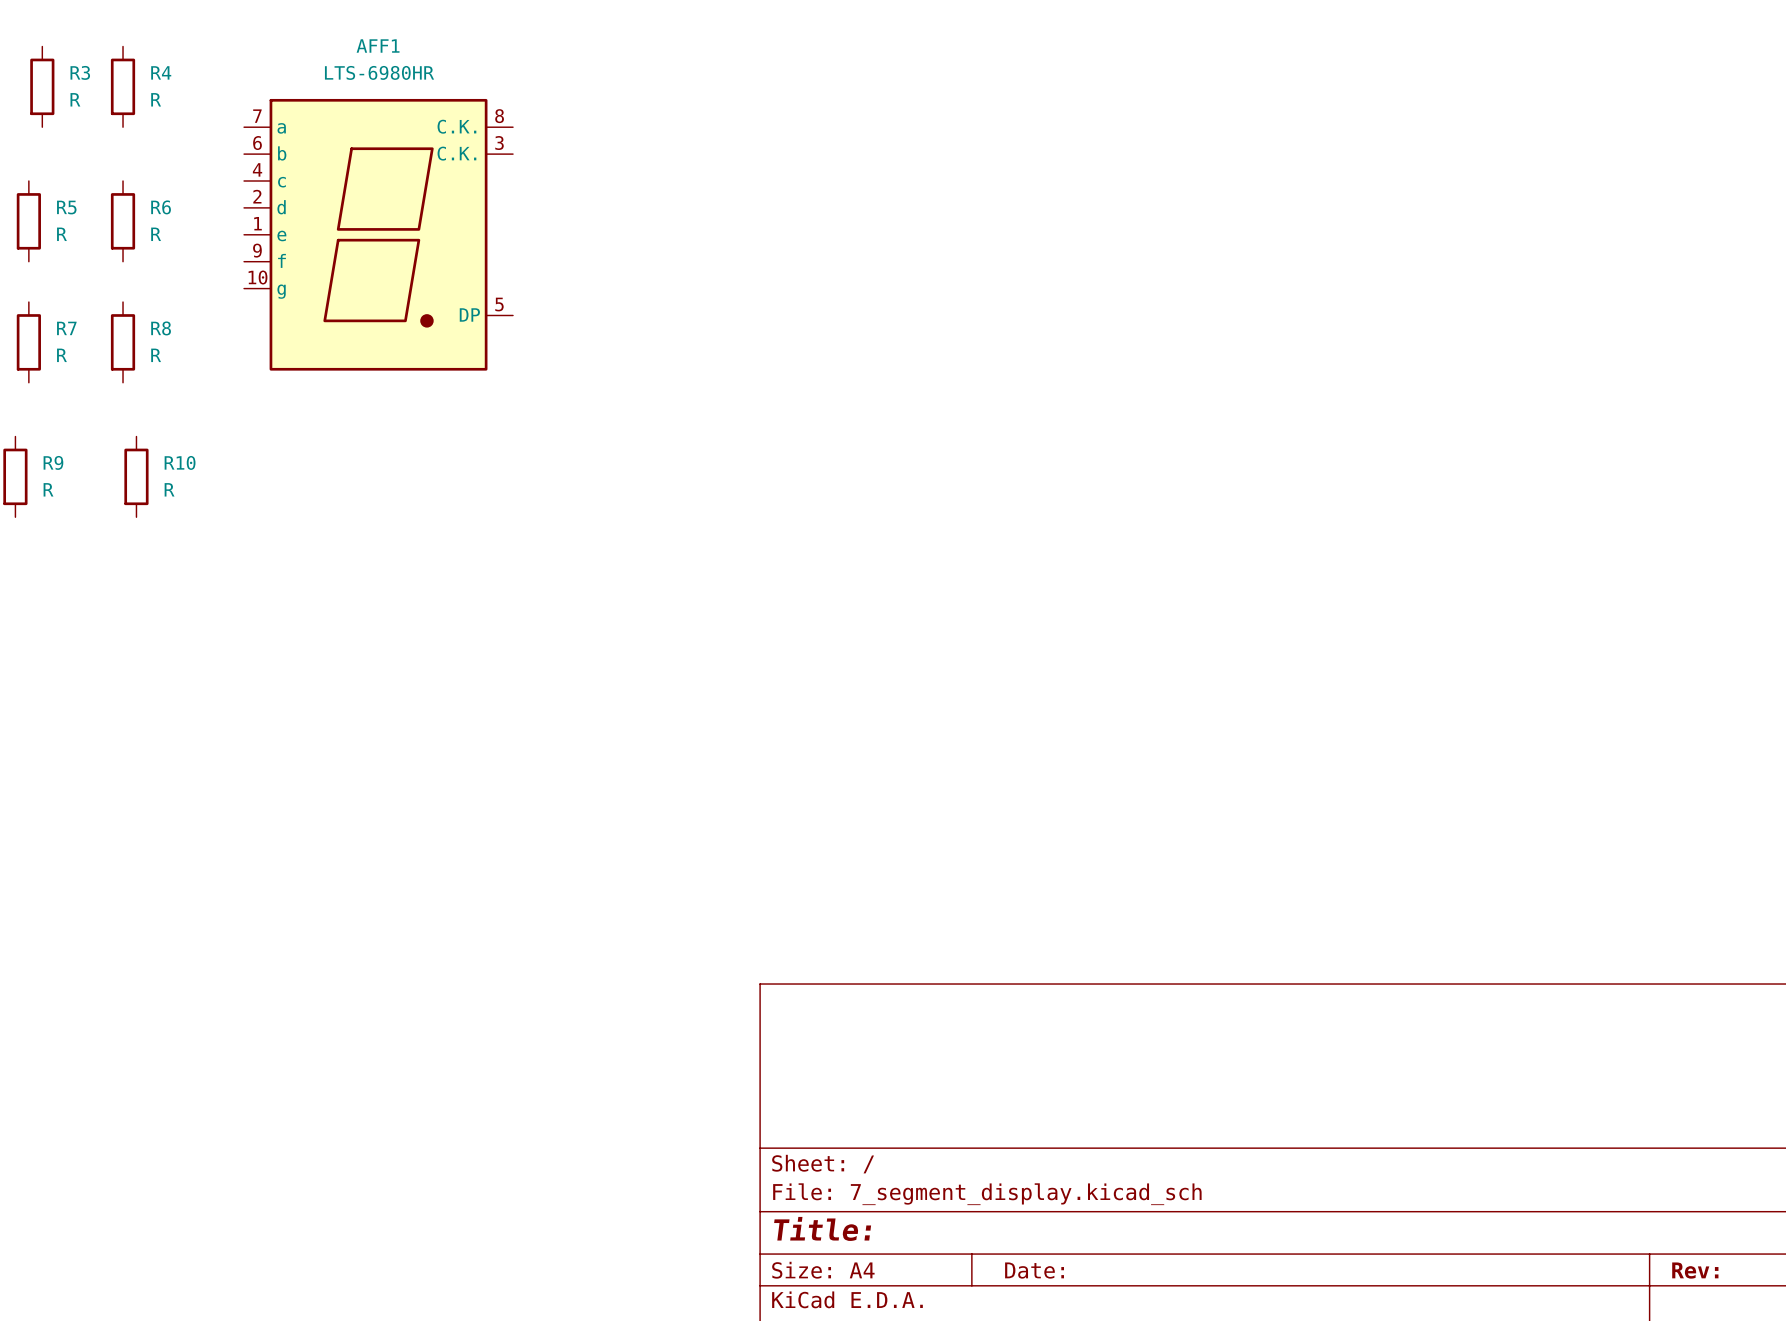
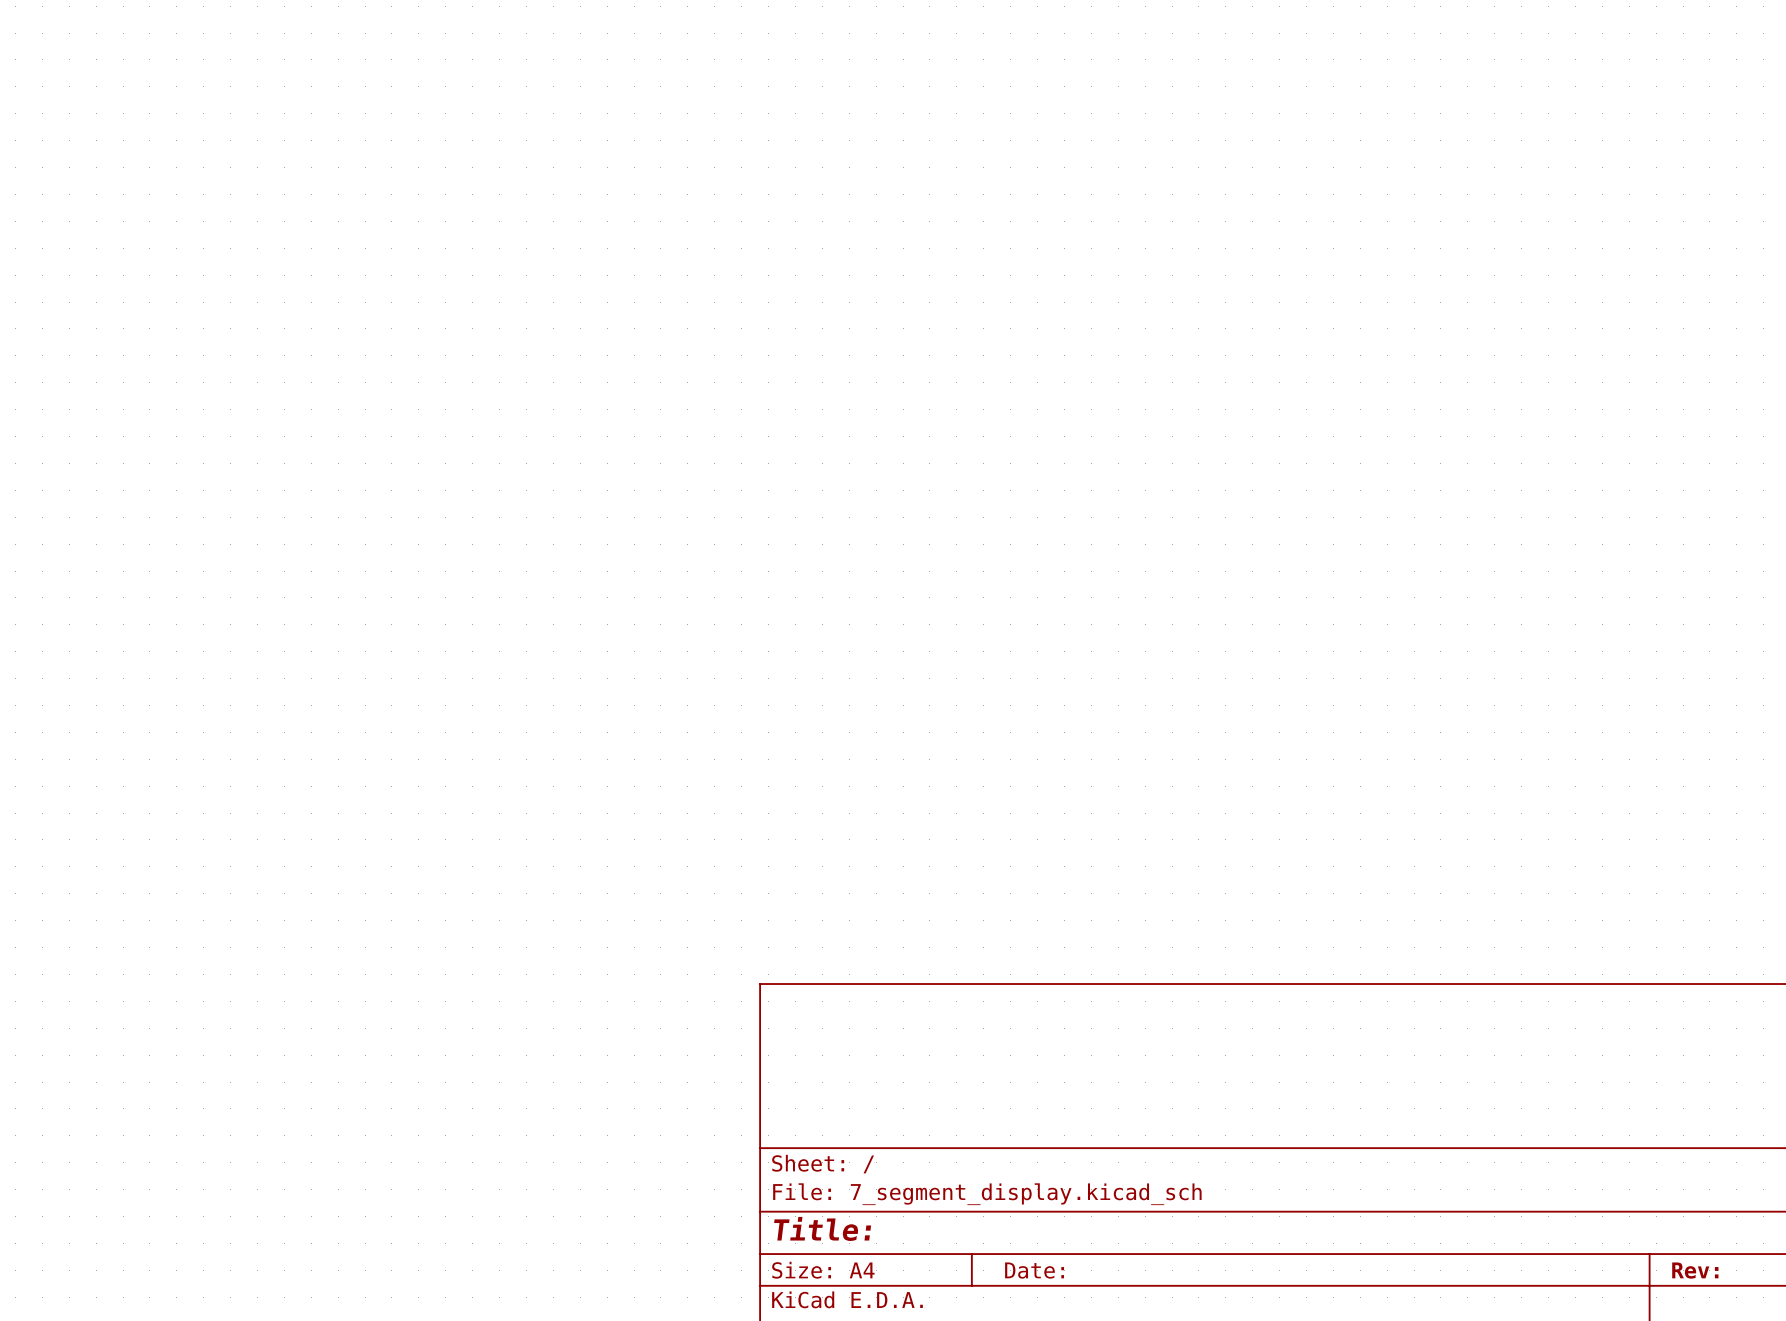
R3: R (42, 86) -> none
R4: R (123, 86) -> none
R5: R (28, 221) -> none
R6: R (123, 221) -> none
AFF1: LTS-6980HR (378, 234) -> none
R7: R (28, 342) -> none
R8: R (123, 342) -> none
R9: R (15, 476) -> none
R10: R (136, 476) -> none

